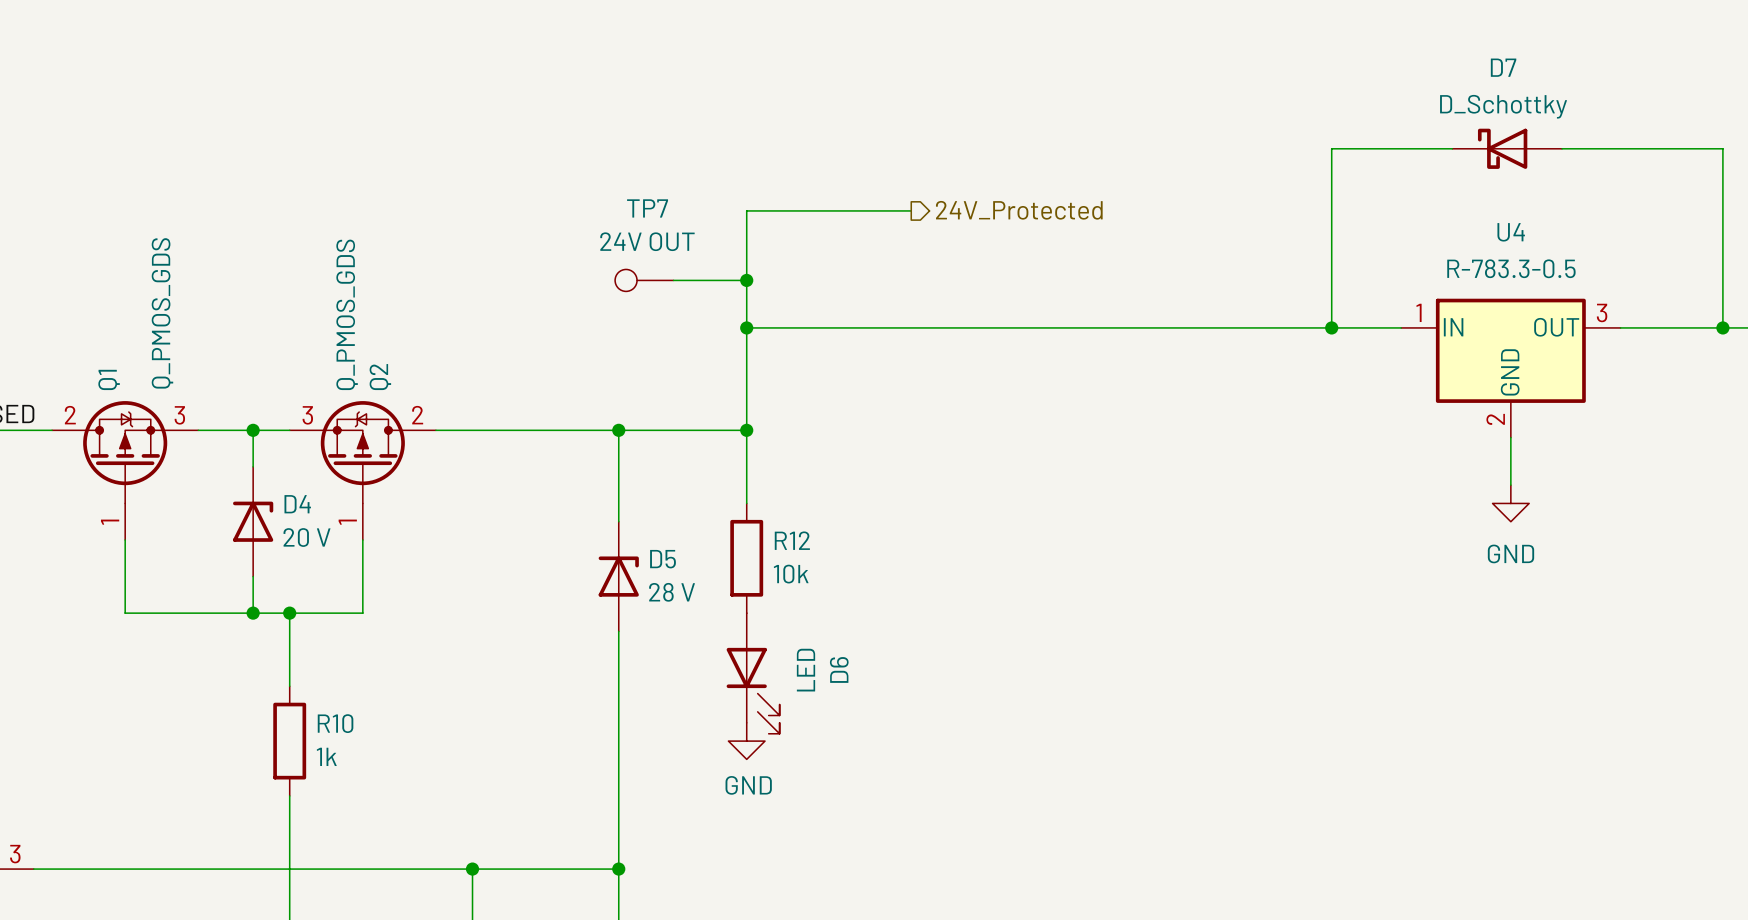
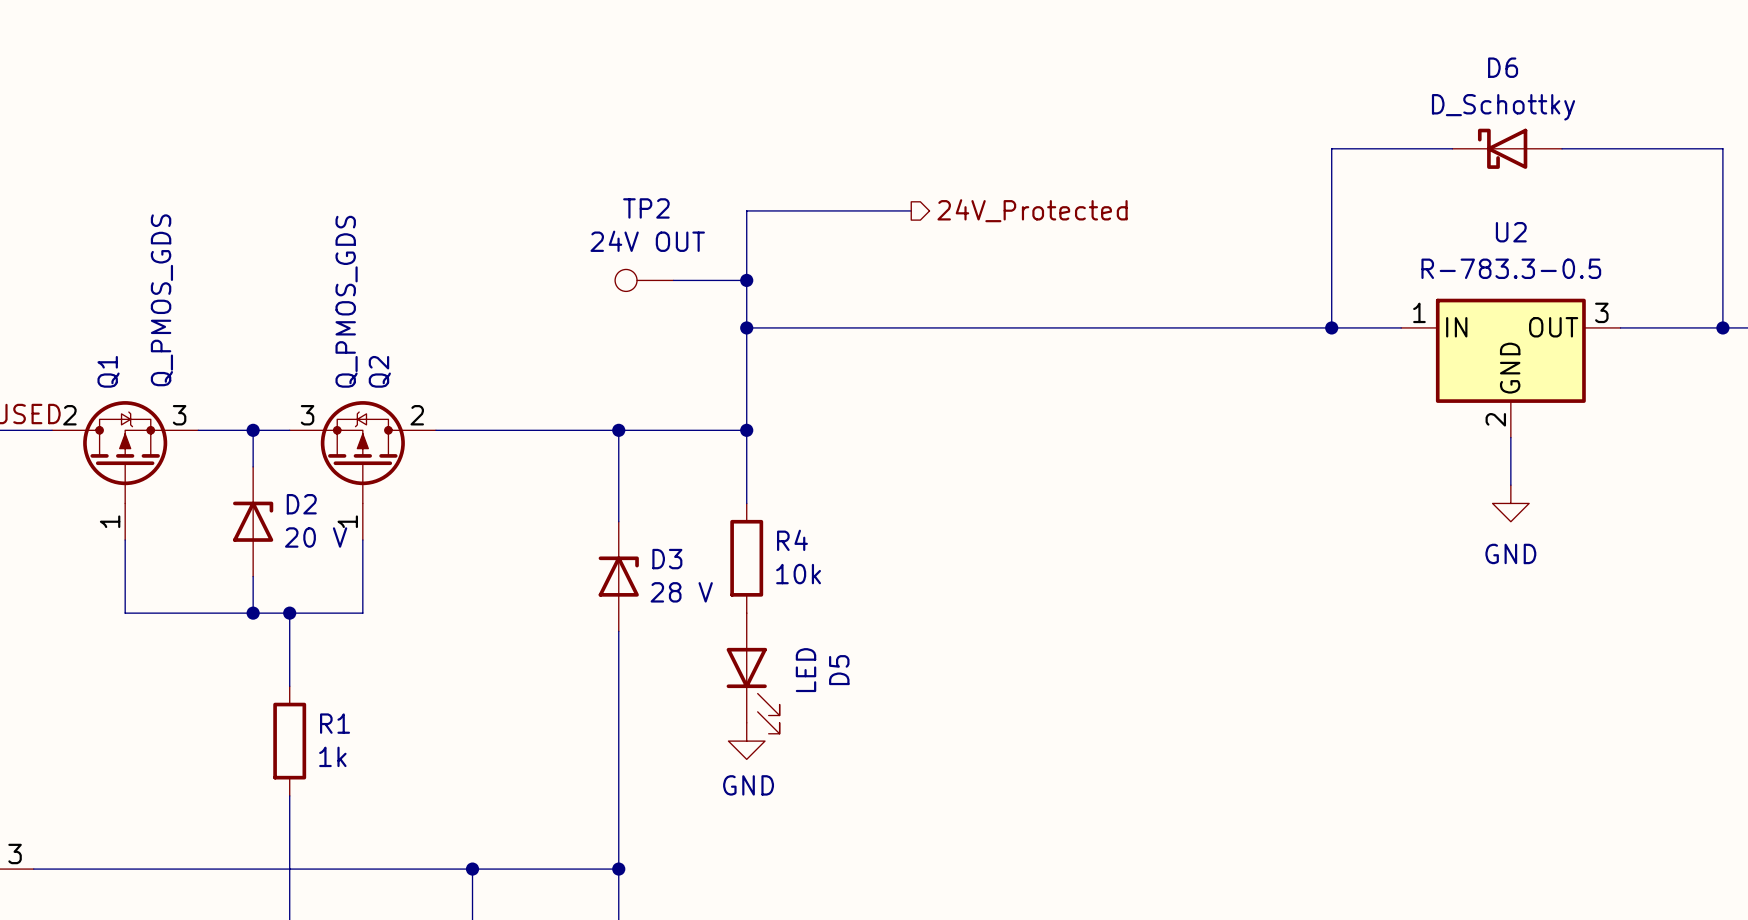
D7 name: D7 (1503, 67) -> D6 (1503, 67)
TP7 name: TP7 (647, 208) -> TP2 (646, 208)
U4 name: U4 (1511, 232) -> U2 (1511, 232)
D4 name: D4 (297, 504) -> D2 (301, 504)
R12 name: R12 (792, 540) -> R4 (792, 540)
D5 name: D5 (663, 559) -> D3 (667, 559)
D6 name: D6 (839, 669) -> D5 (839, 670)
R10 name: R10 (335, 723) -> R1 (335, 723)

